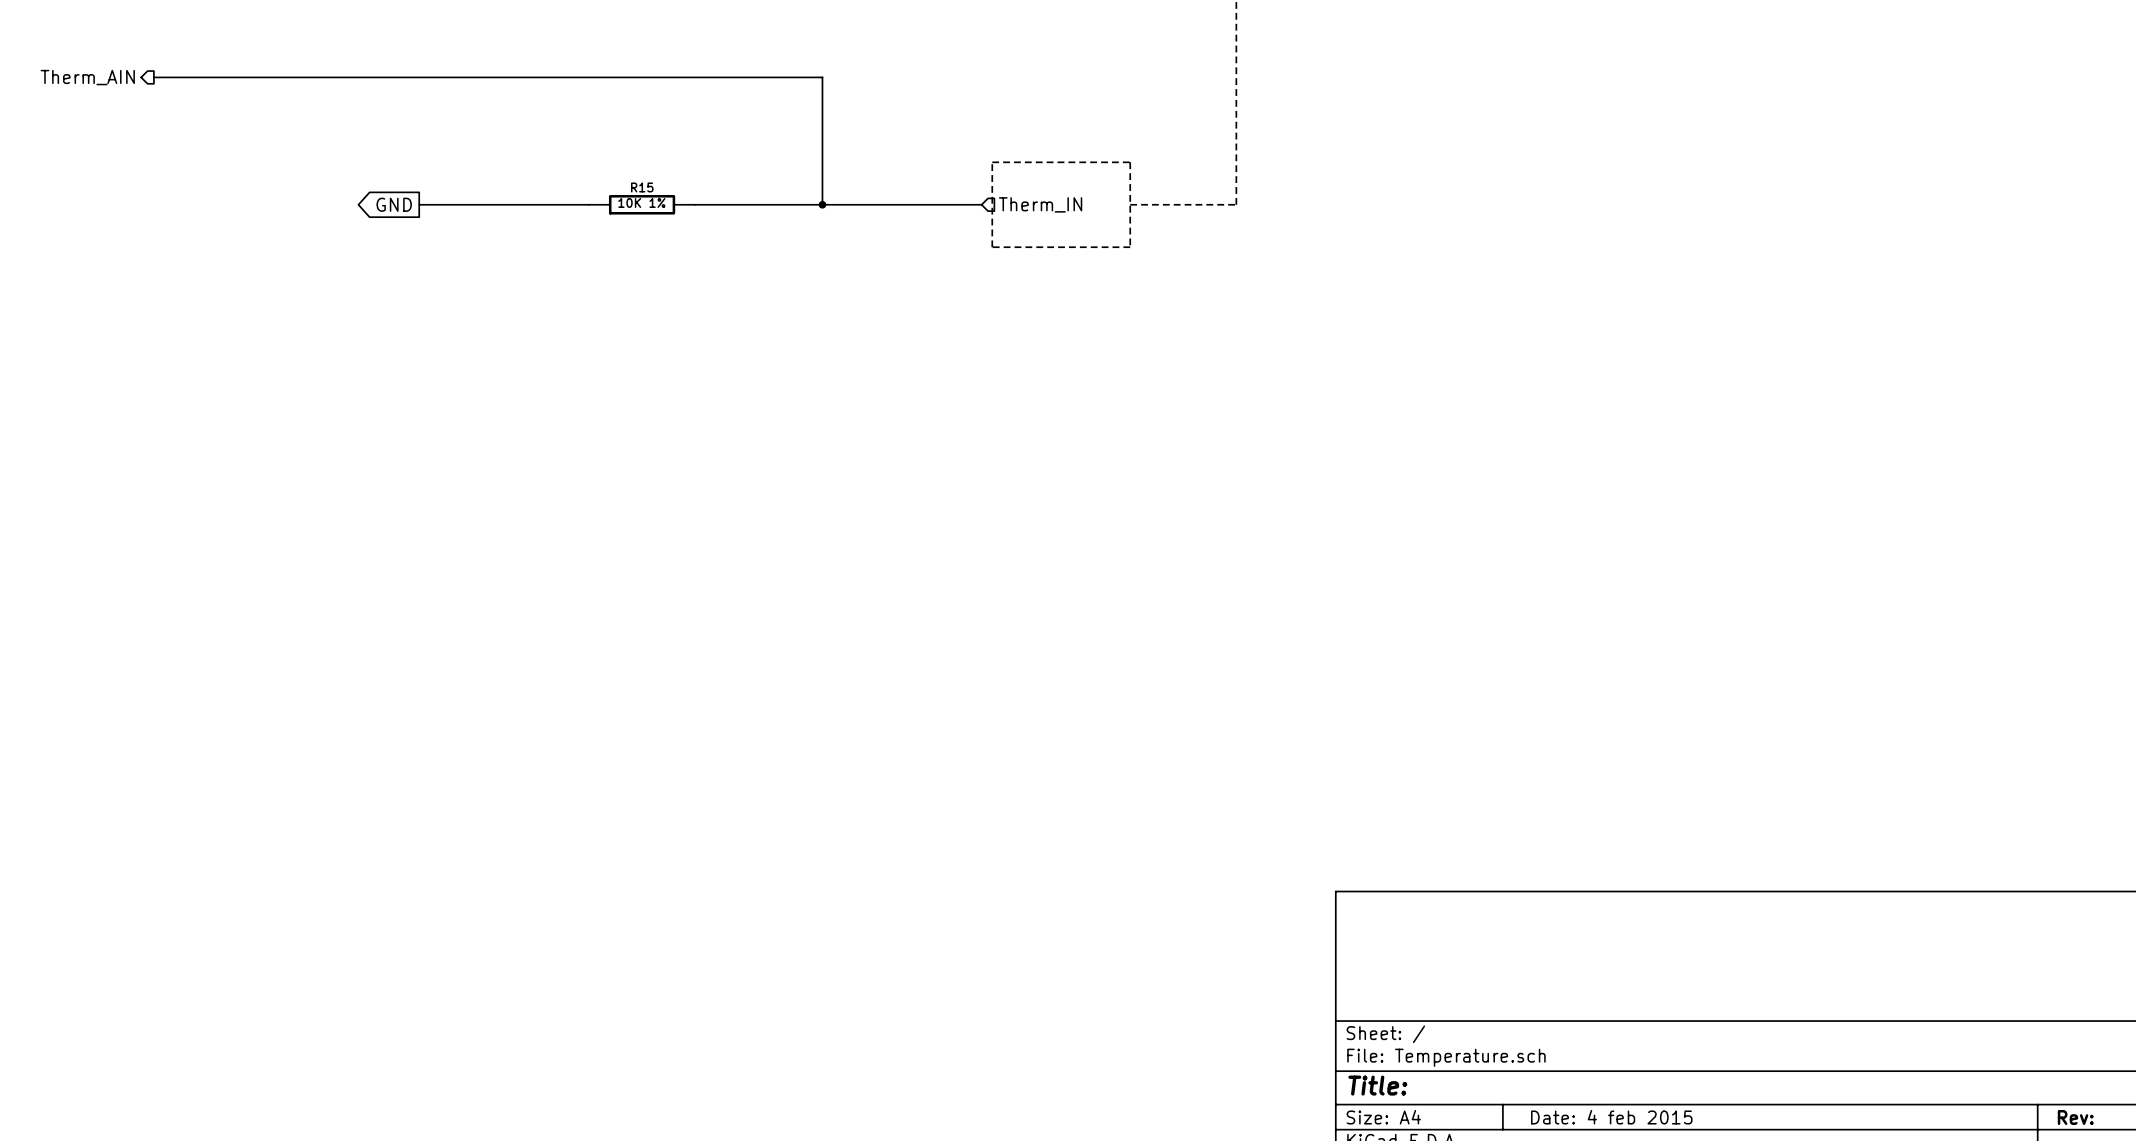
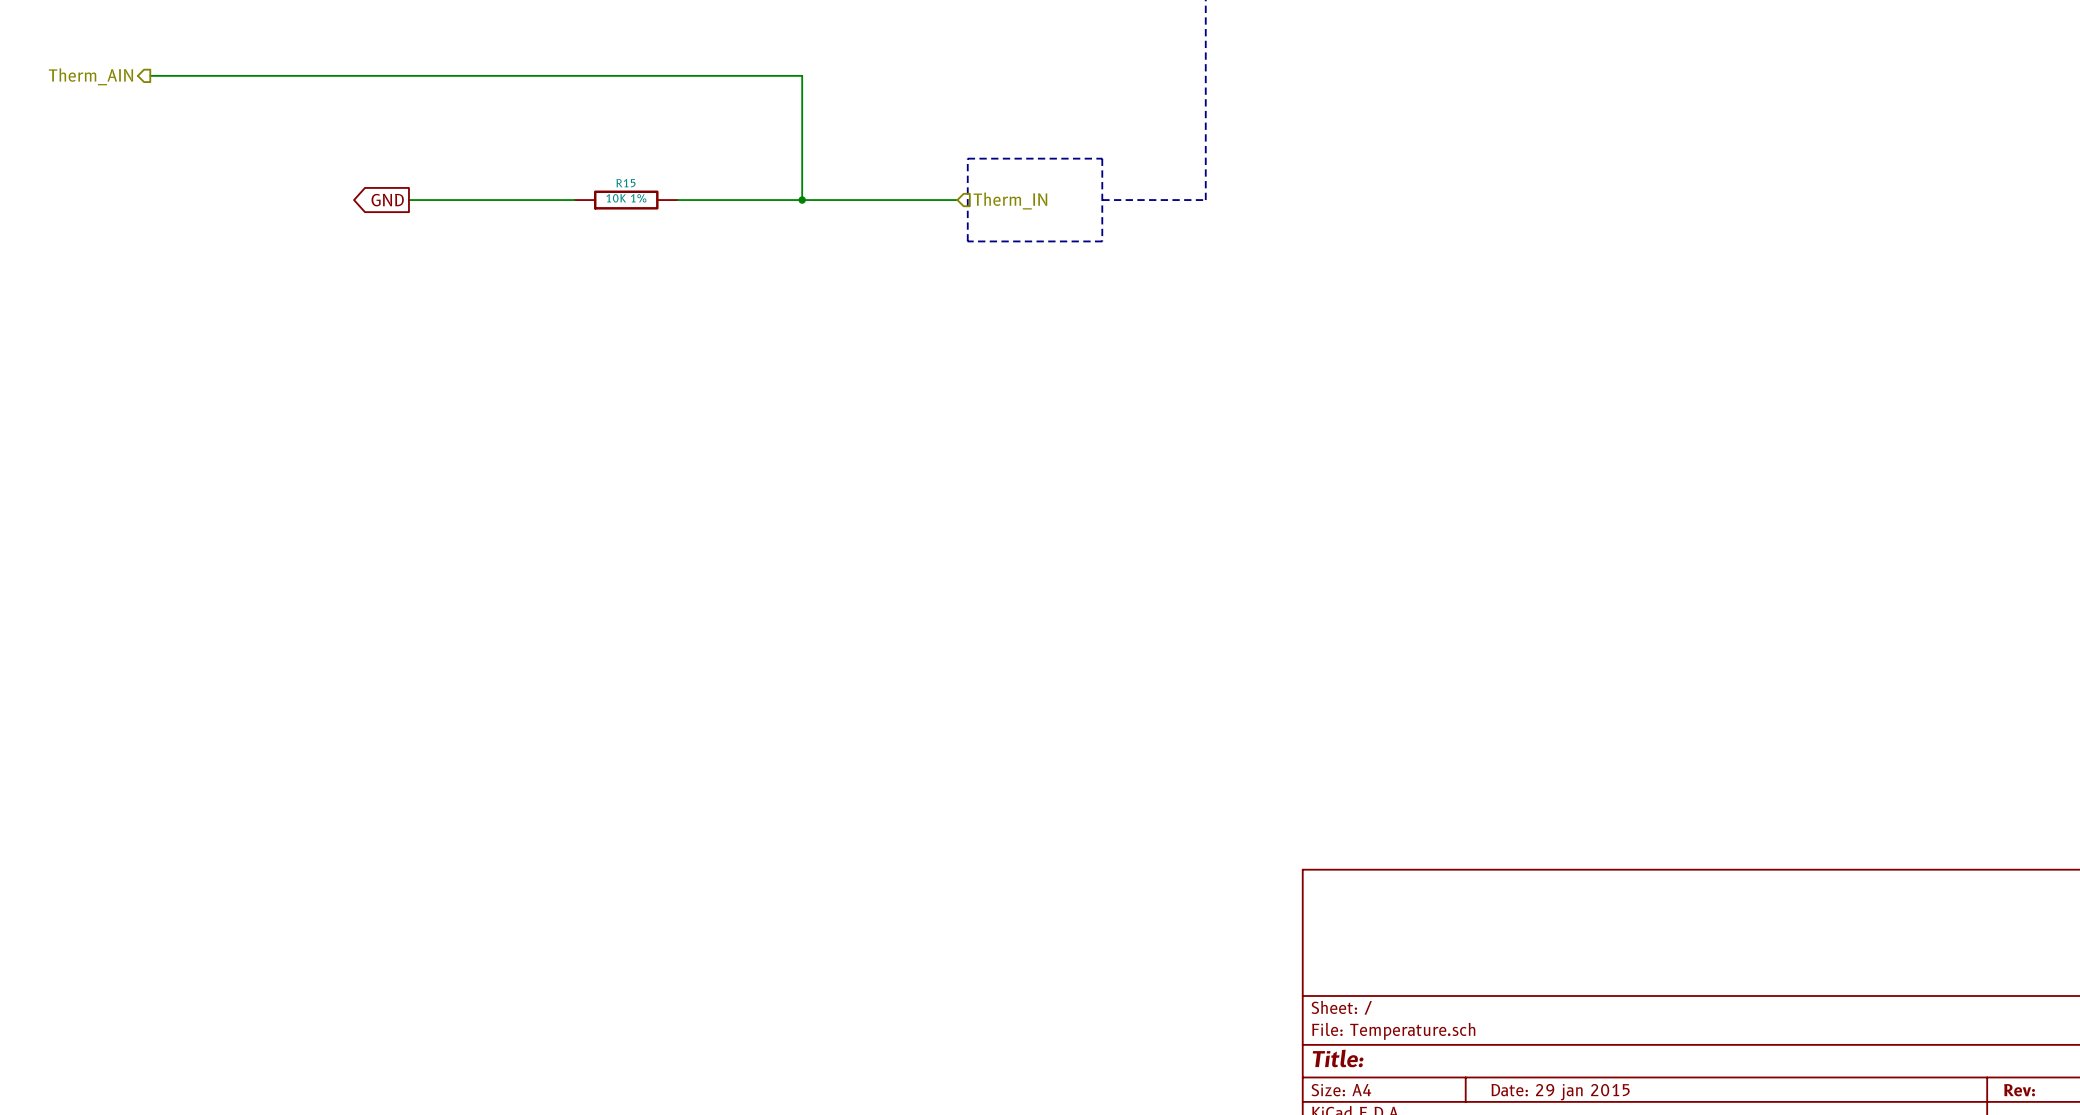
title block: Date: 4 feb 2015 (1611, 1117) -> Date: 29 jan 2015 (1560, 1092)

